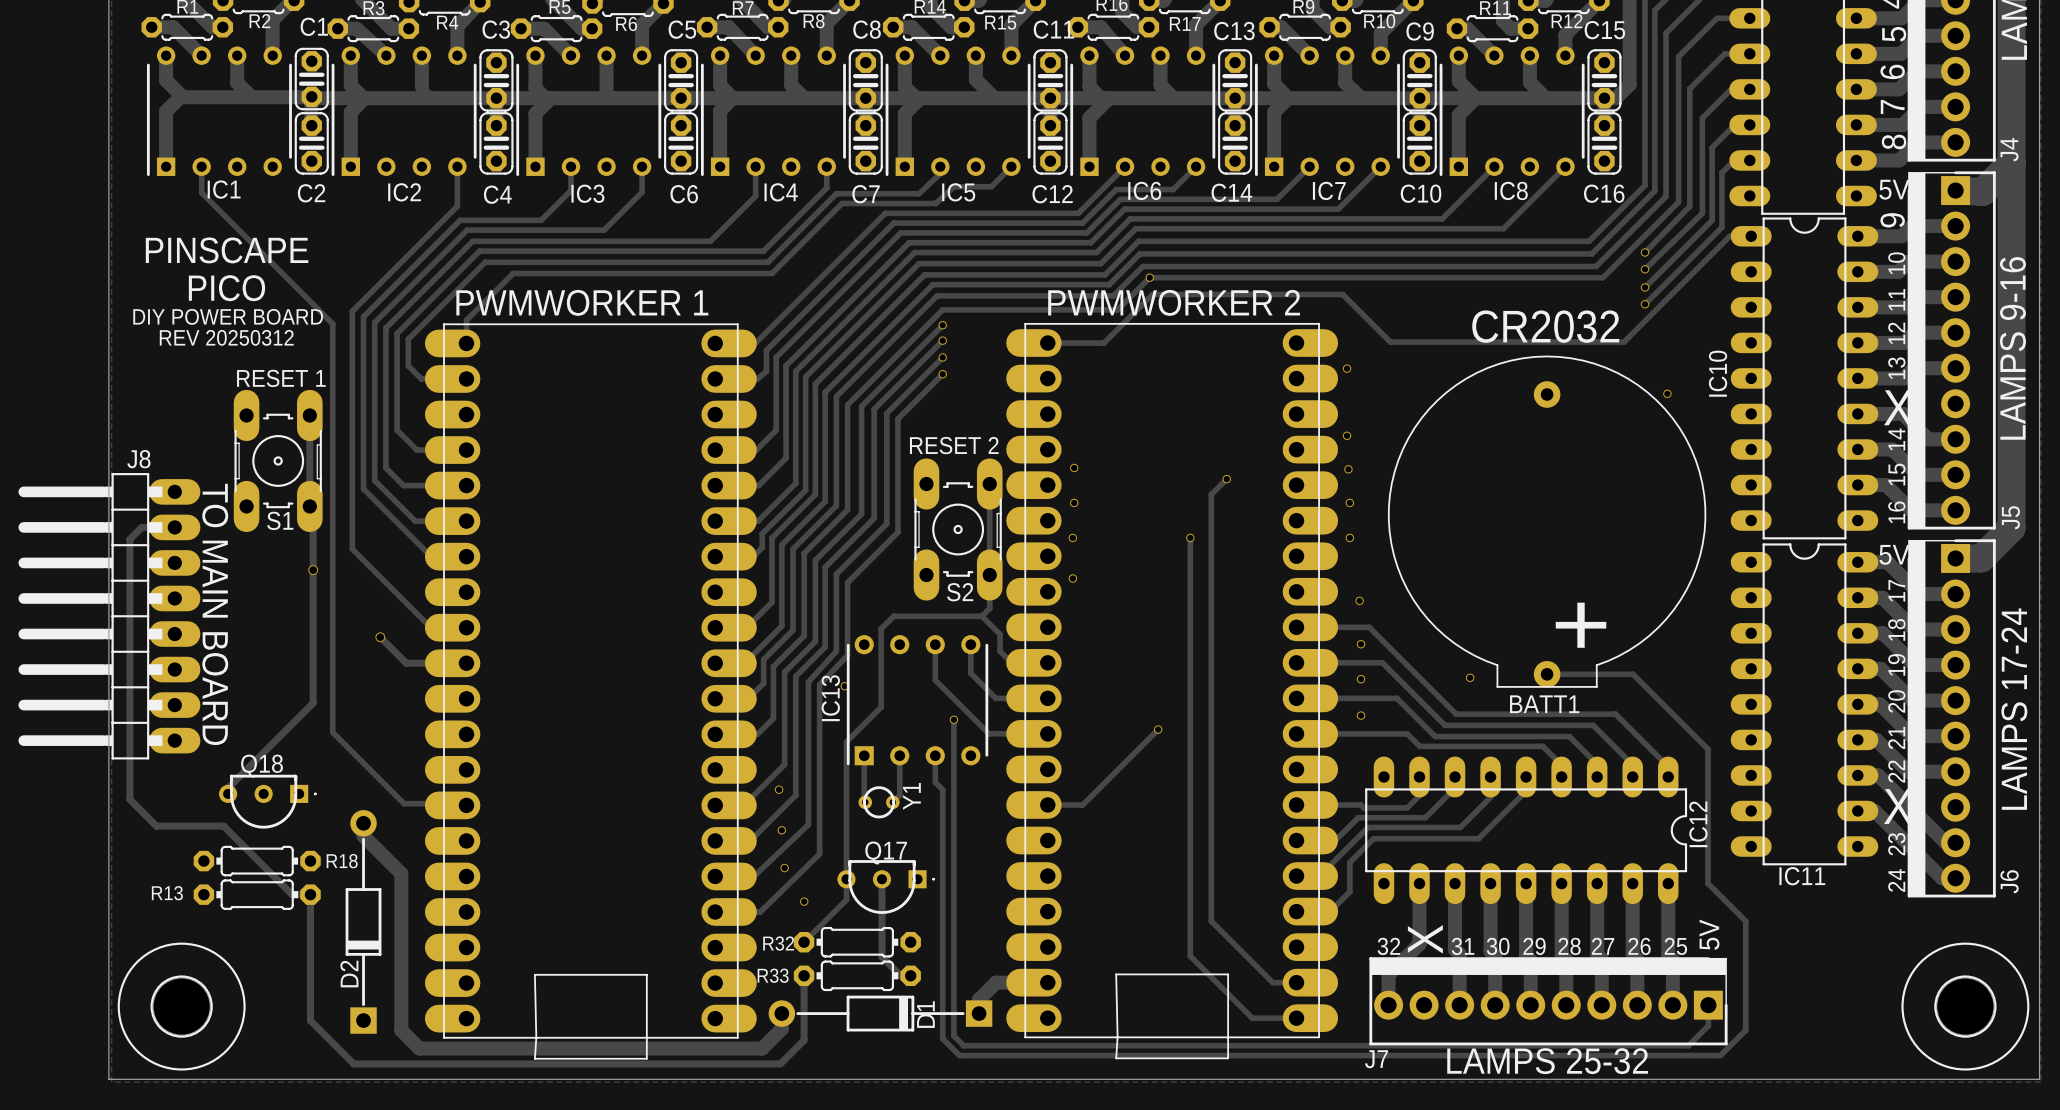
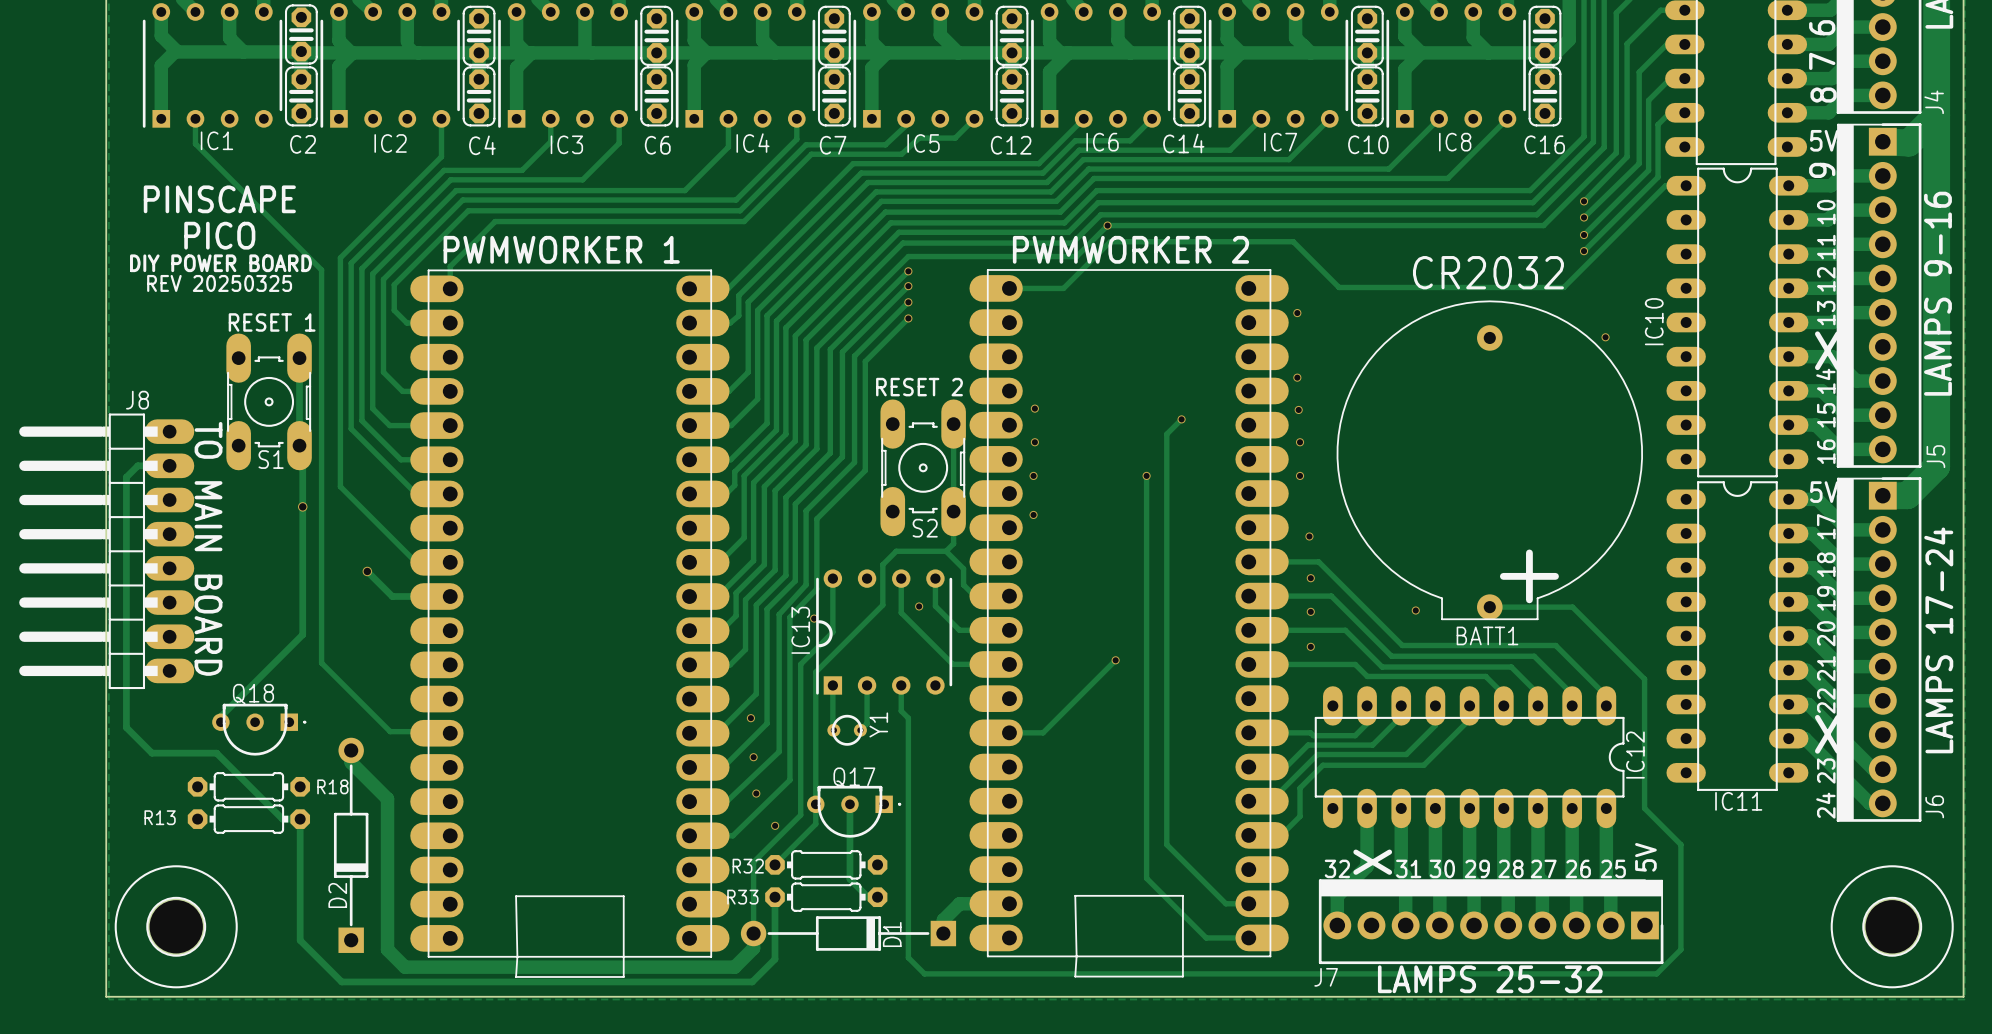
text: REV 20250312 (226, 337) -> REV 20250325 (219, 283)
track: (930, 616) (893, 616) (881, 628) (881, 707) -> (896, 551) (882, 564) (882, 605) (849, 638)
IC13 footprint: [846, 635, 989, 766] -> [816, 569, 953, 695]
track: none -> (832, 578) (832, 632) (800, 664) (800, 815) (753, 862) (753, 933)
track: (953, 719) (953, 1035) (963, 1045) (1688, 1045) (1708, 1025) (1708, 1005) -> none
via position: (953, 719) -> (919, 606)

